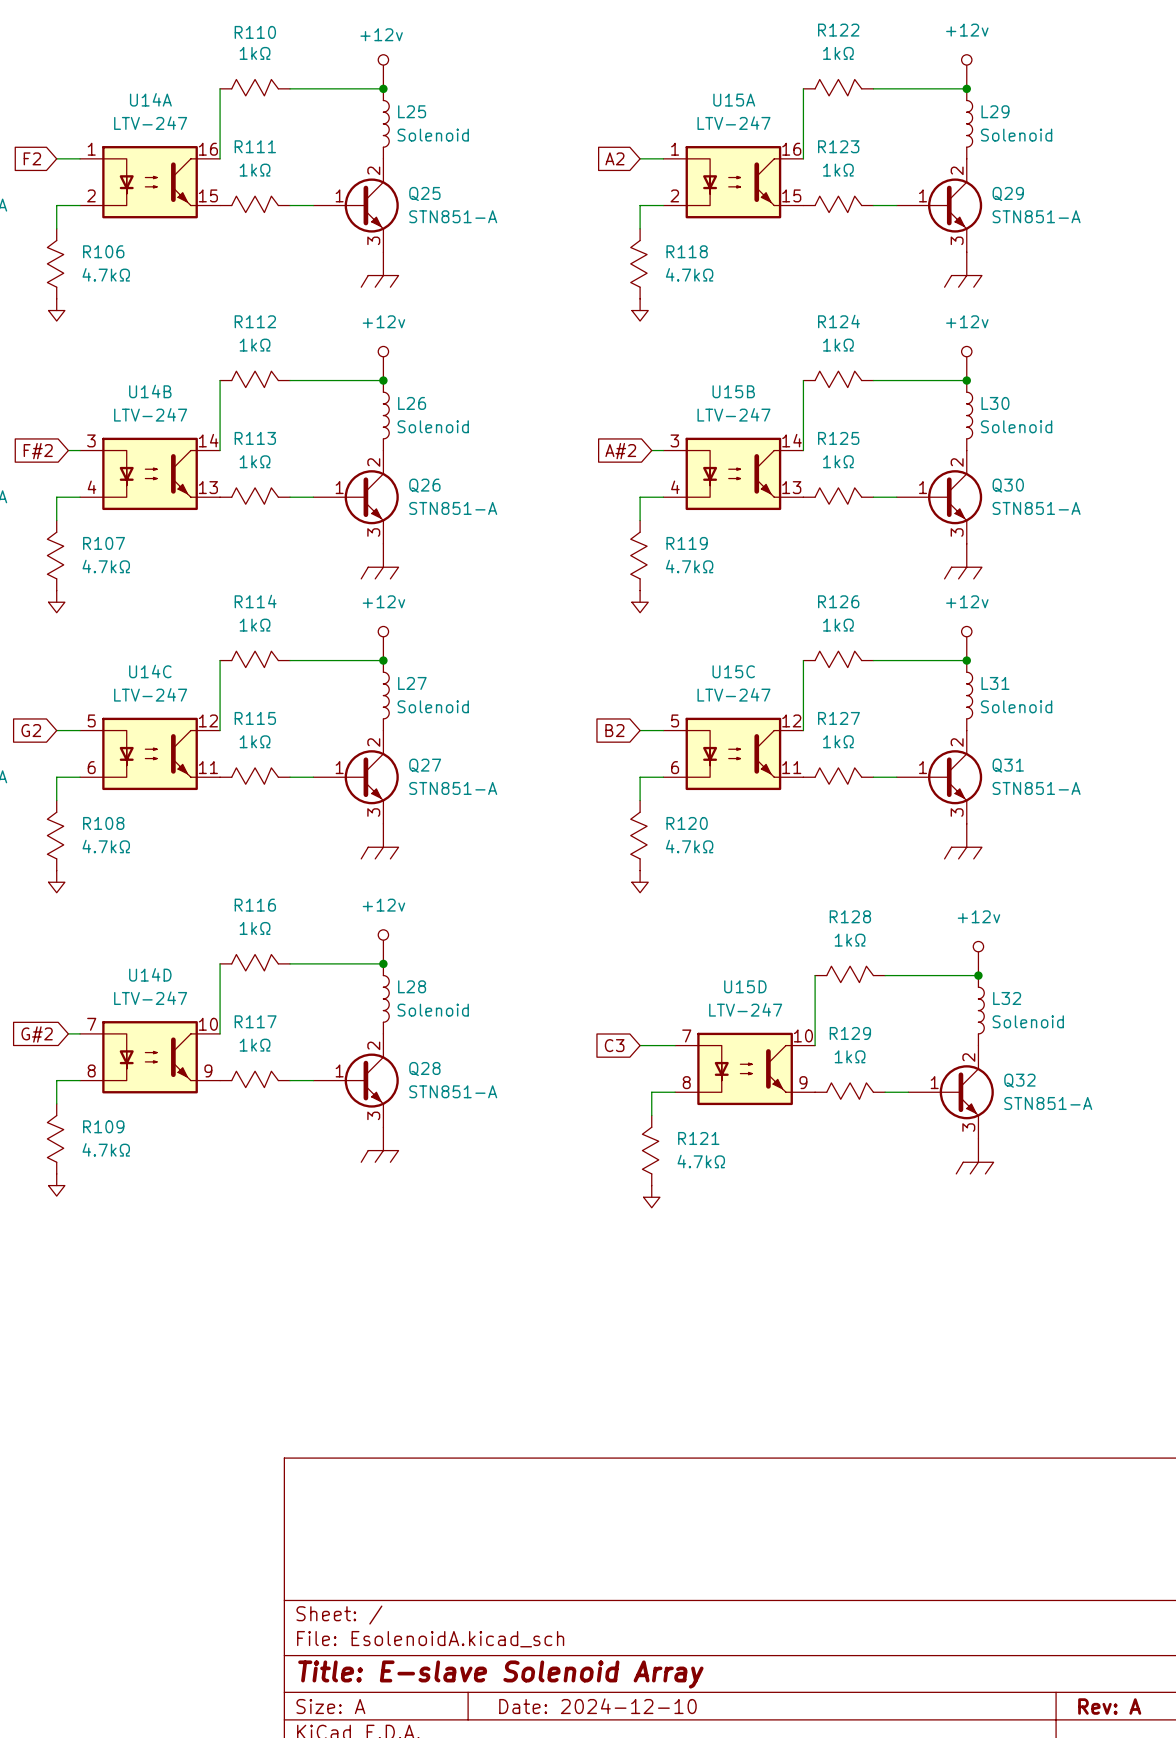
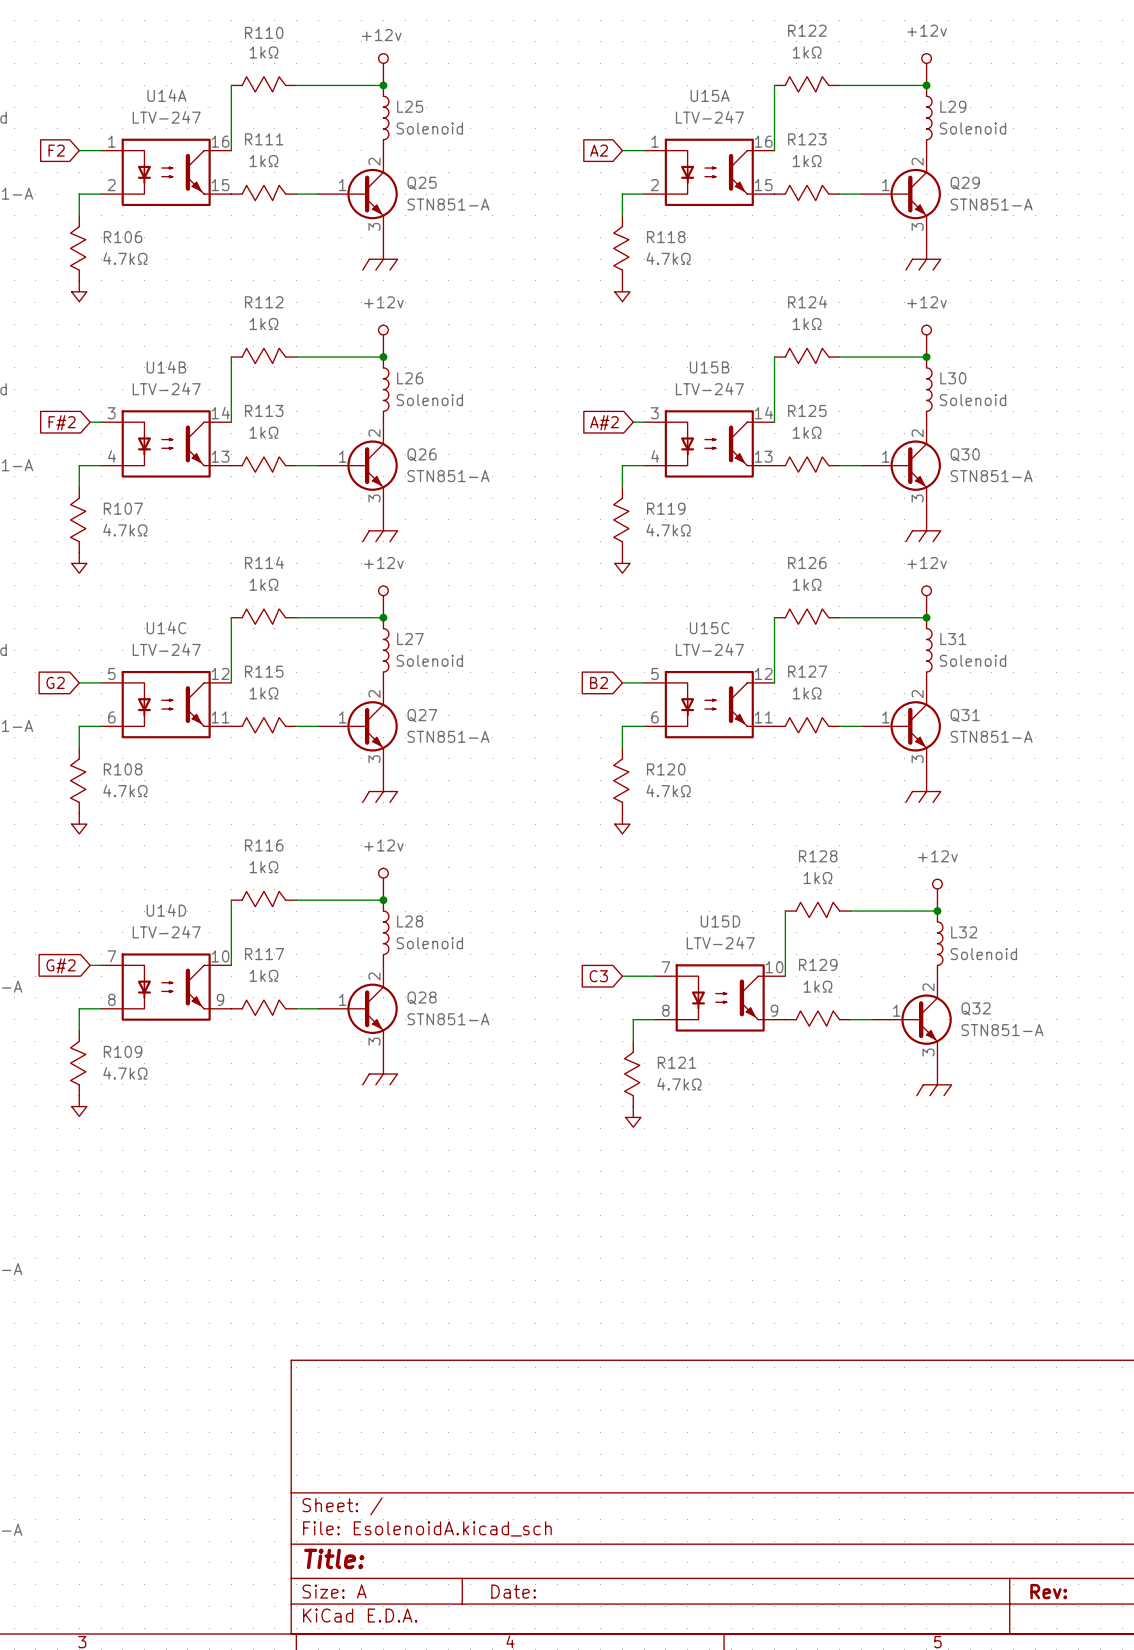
title block: Title: E-slave Solenoid Array (500, 1674) -> Title: (334, 1558)
title block: Date: 2024-12-10 (597, 1706) -> Date: (513, 1591)
title block: Rev: A (1109, 1706) -> Rev: (1048, 1591)

